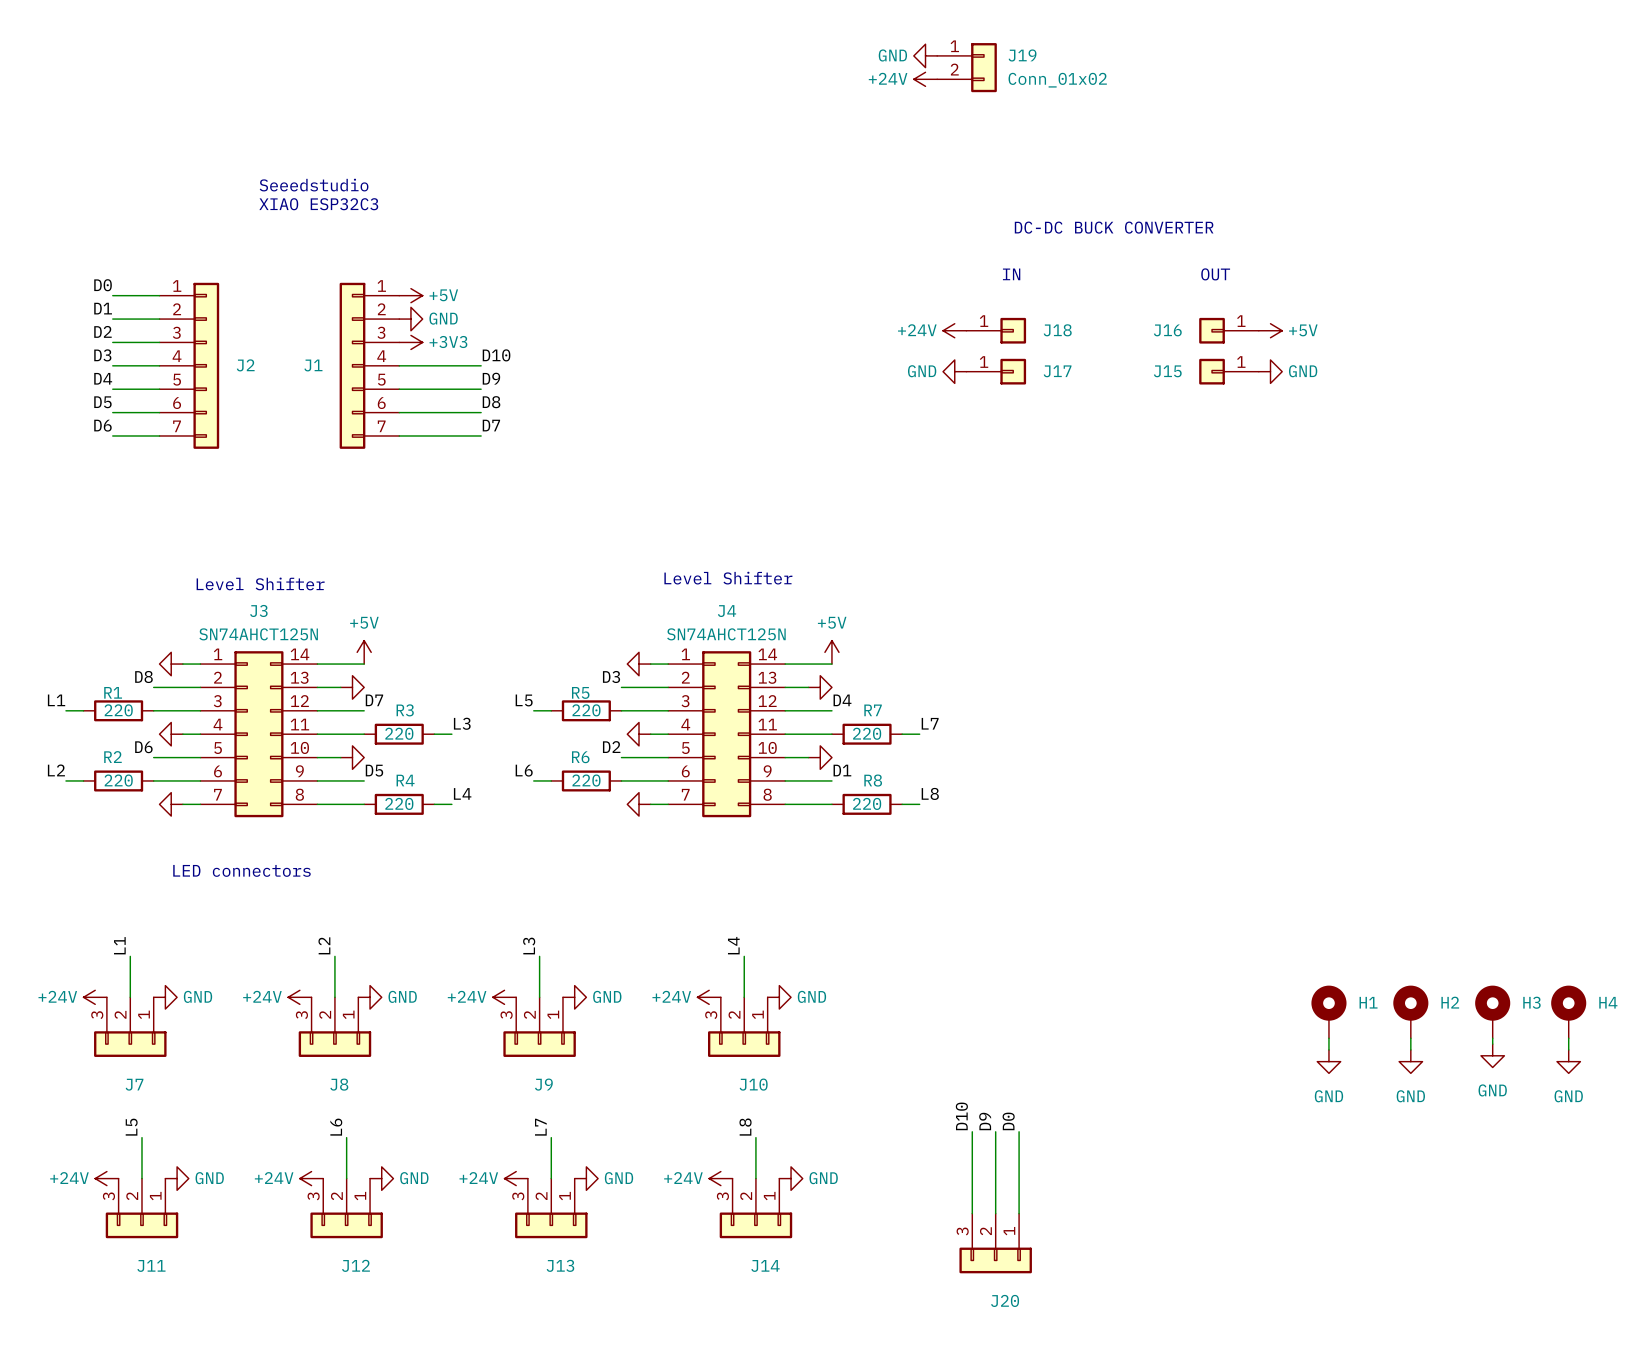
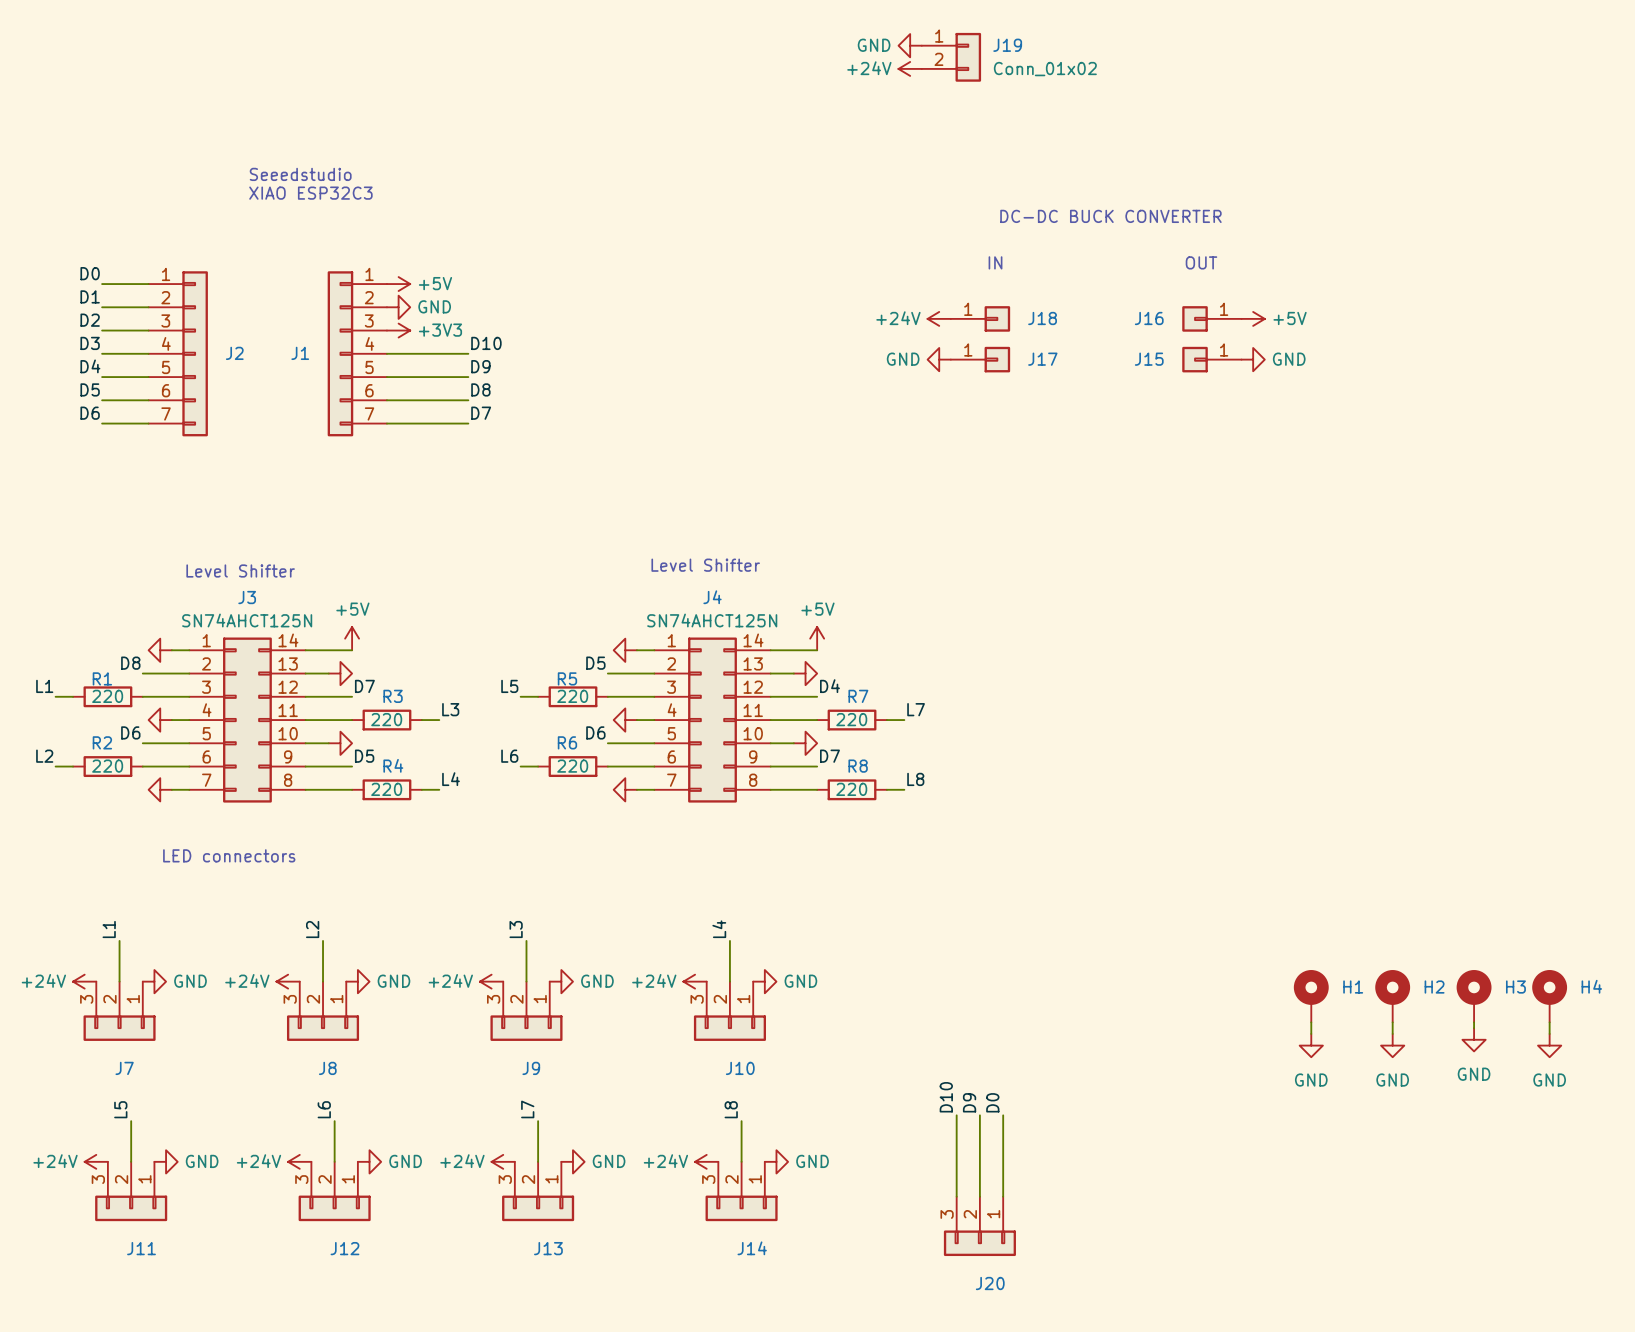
label: D3 (611, 676) -> D5 (595, 663)
label: D2 (611, 747) -> D6 (595, 732)
label: D1 (842, 770) -> D7 (829, 756)

